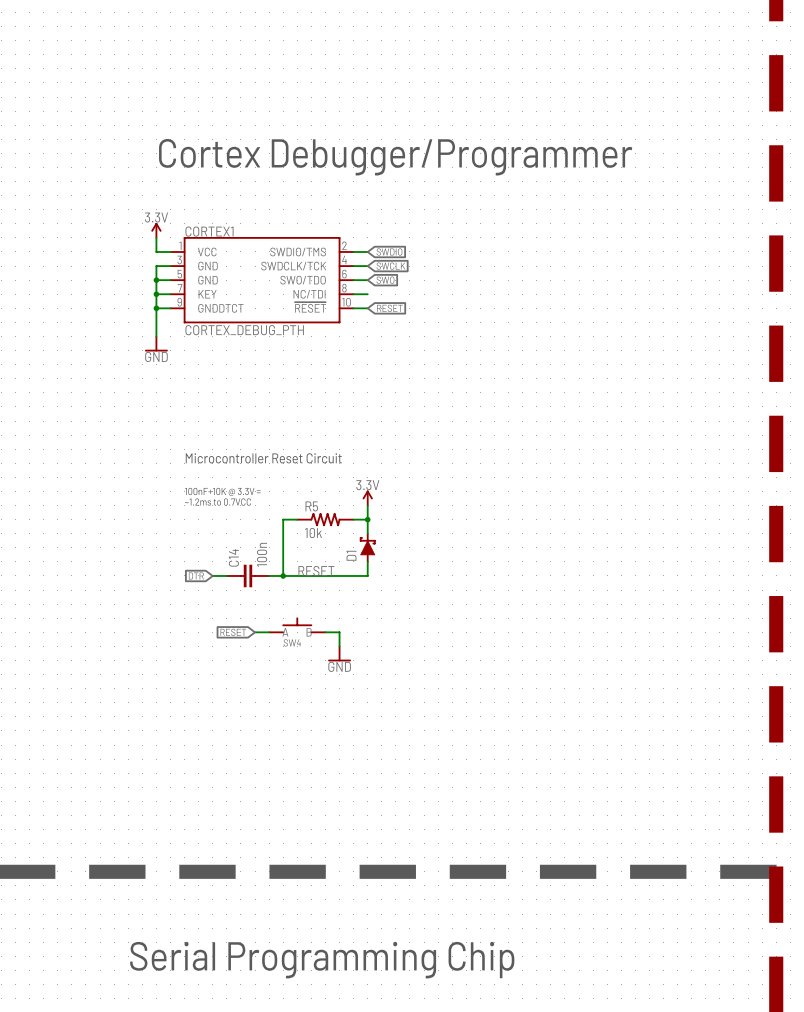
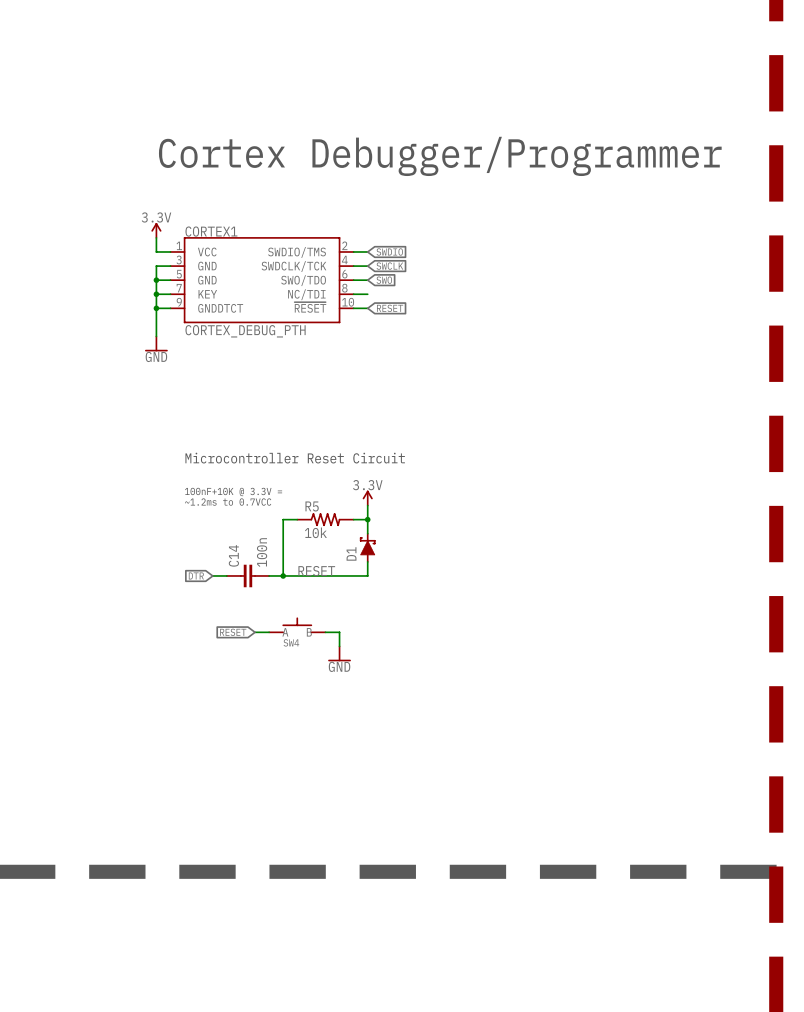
text: Serial Programming Chip (322, 960) -> none

